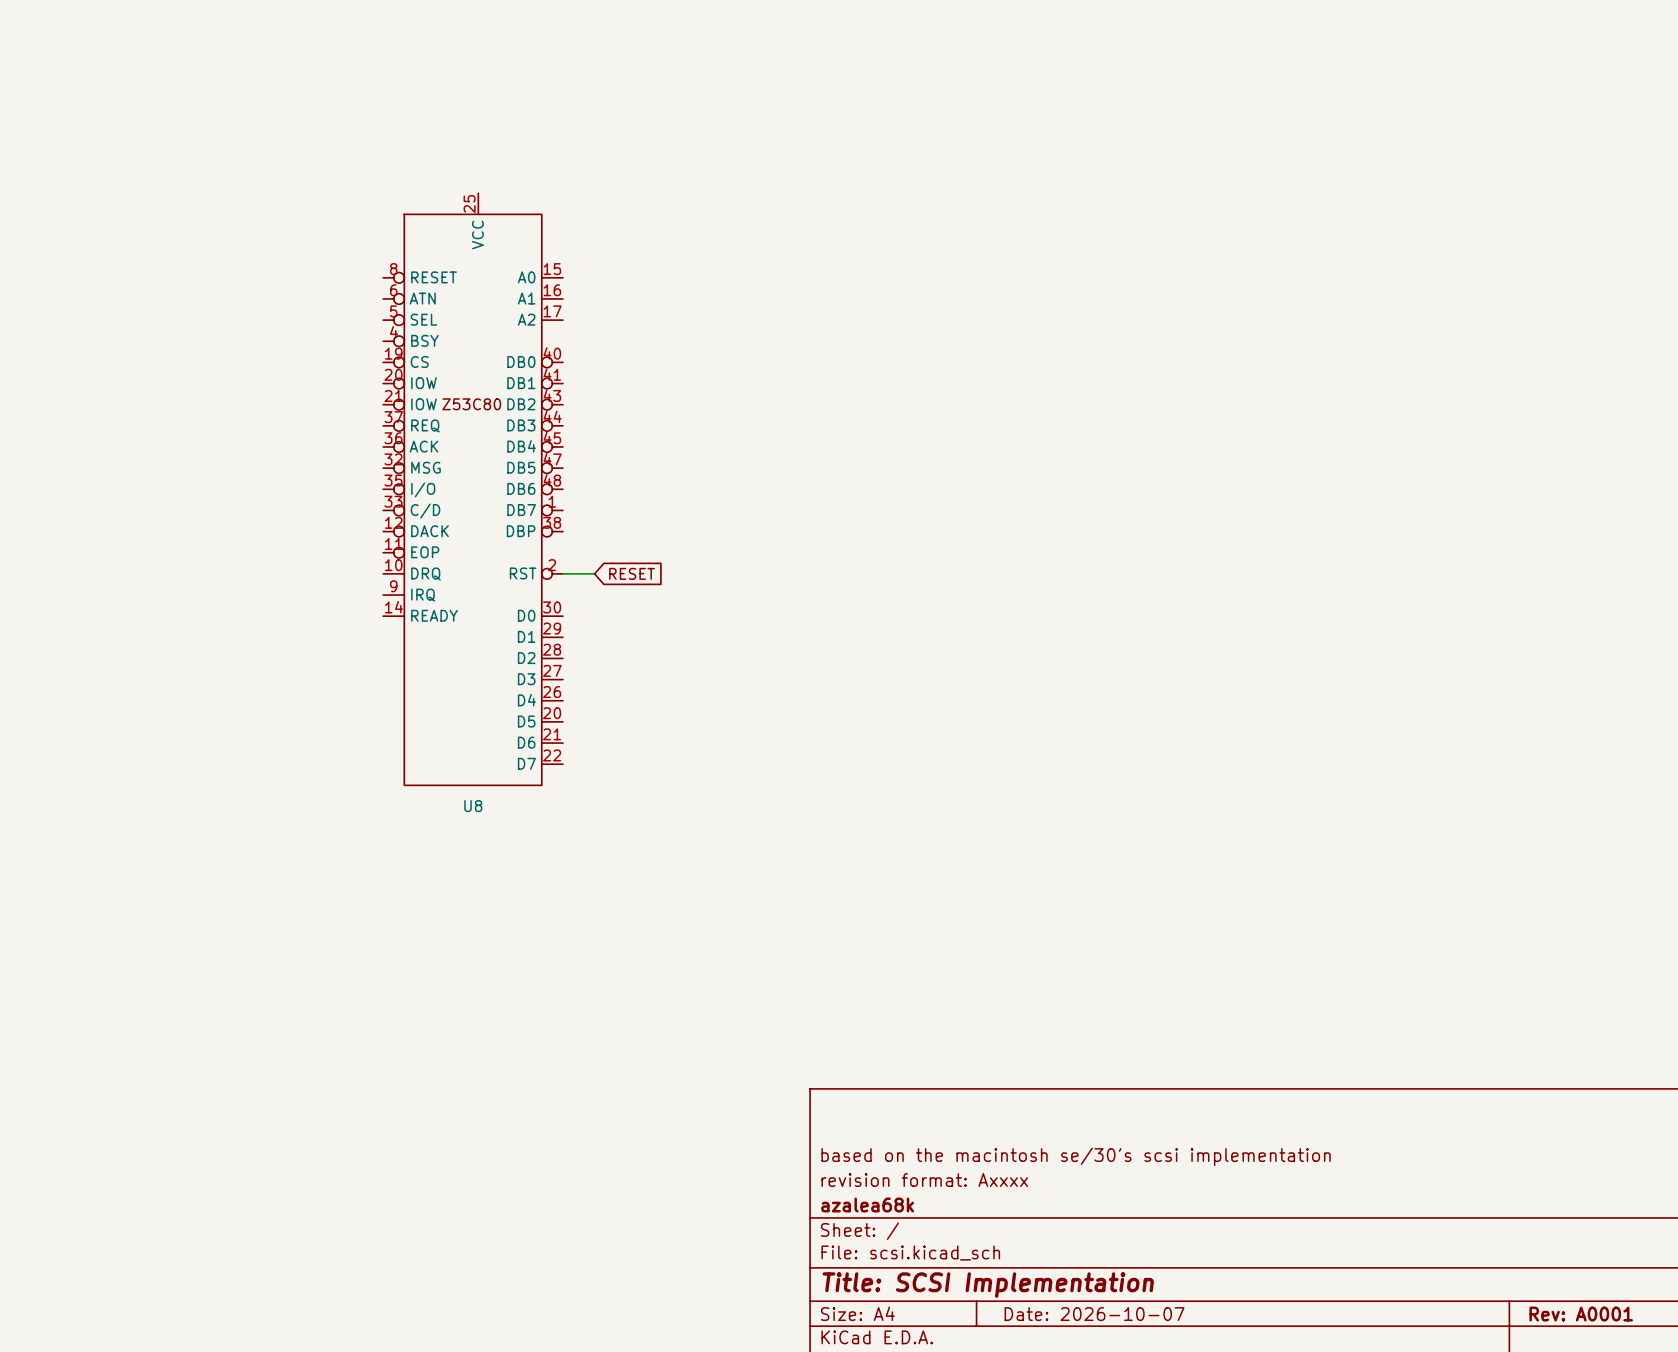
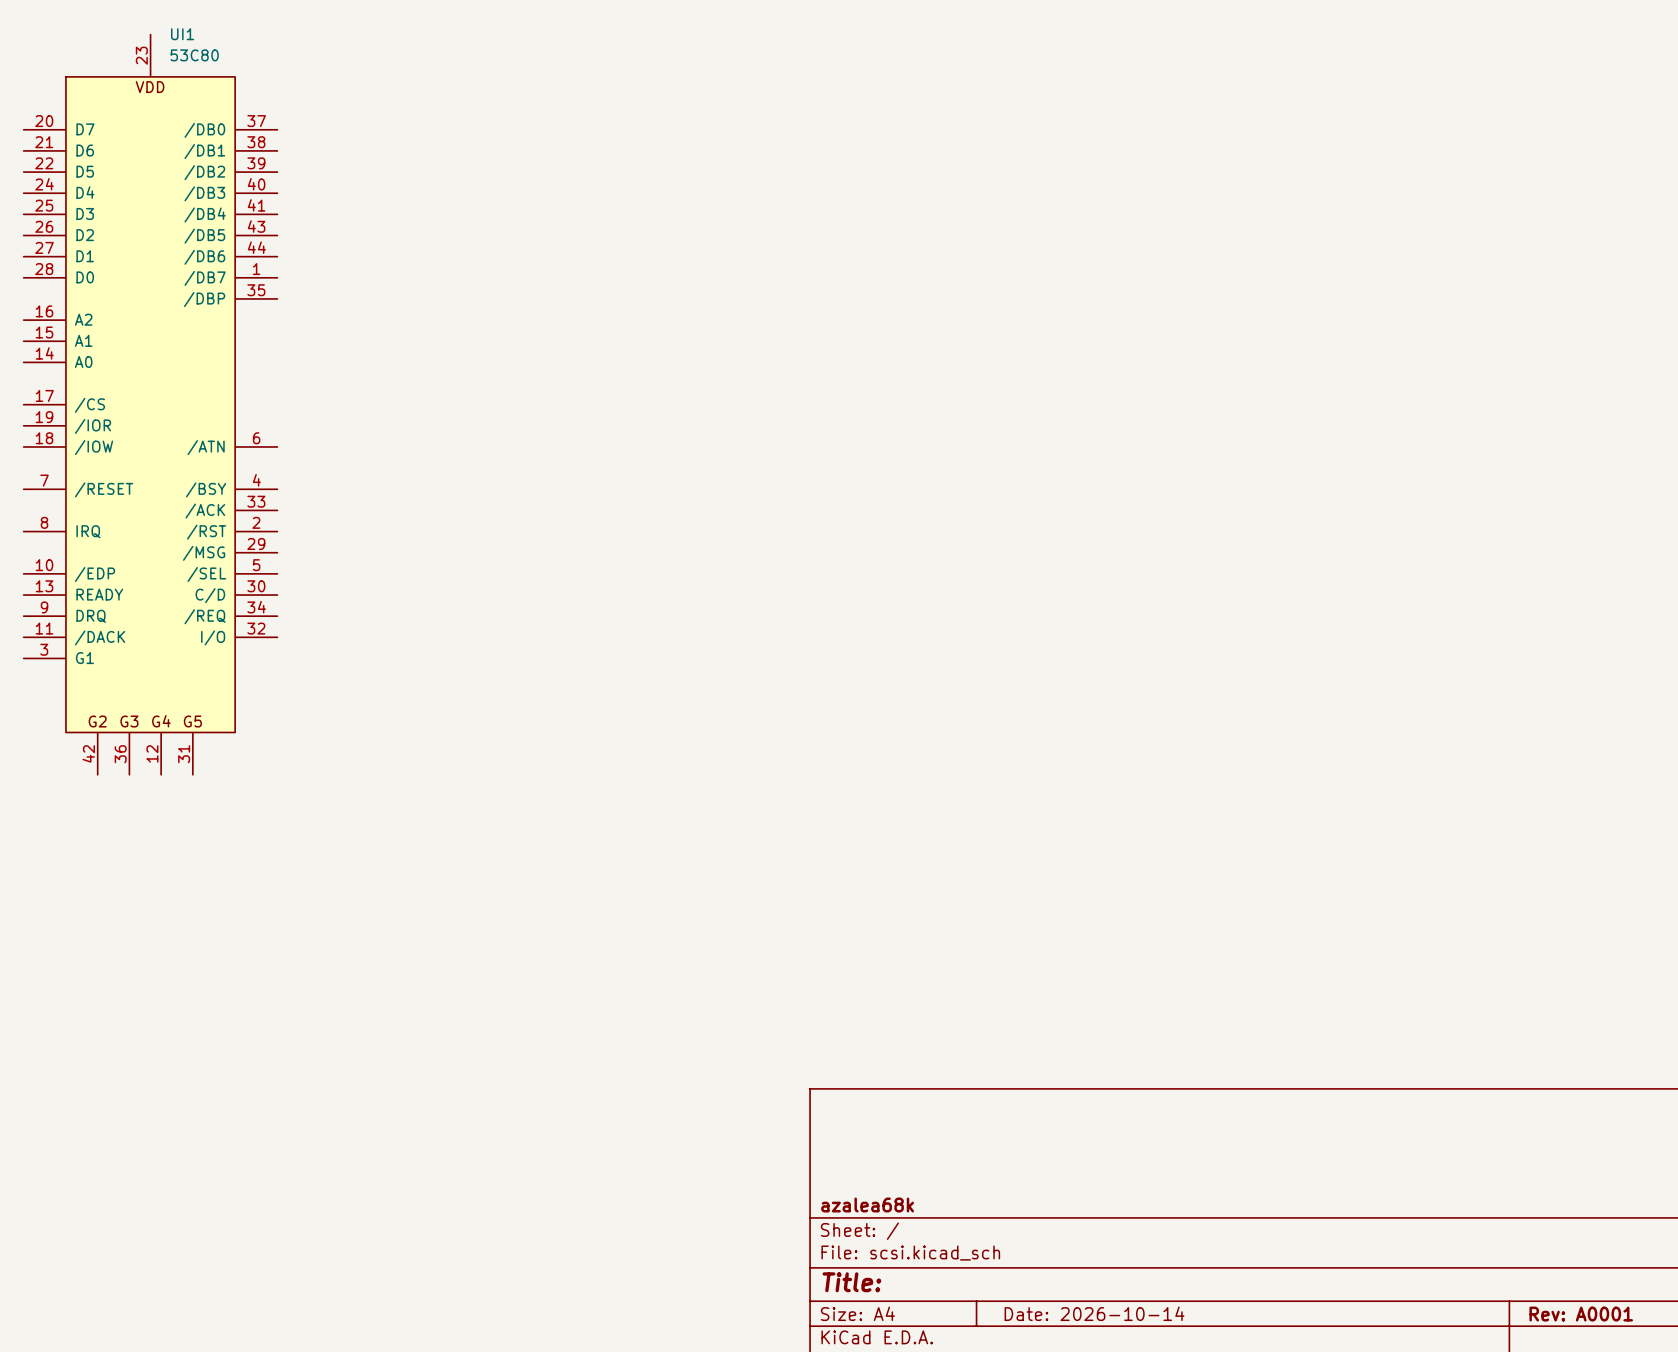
UI1: none -> 53C80 (150, 404)
U8: (473, 489) -> none
wire: (562, 573) (594, 573) -> none
global label: RESET (632, 573) -> none
title block: based on the macintosh se/30's scsi implementation (1076, 1156) -> none
title block: revision format: Axxxx (924, 1180) -> none
title block: Title: SCSI Implementation (988, 1285) -> Title: (851, 1282)
title block: Date: 2026-10-07 (1094, 1314) -> Date: 2026-10-14 (1094, 1313)

